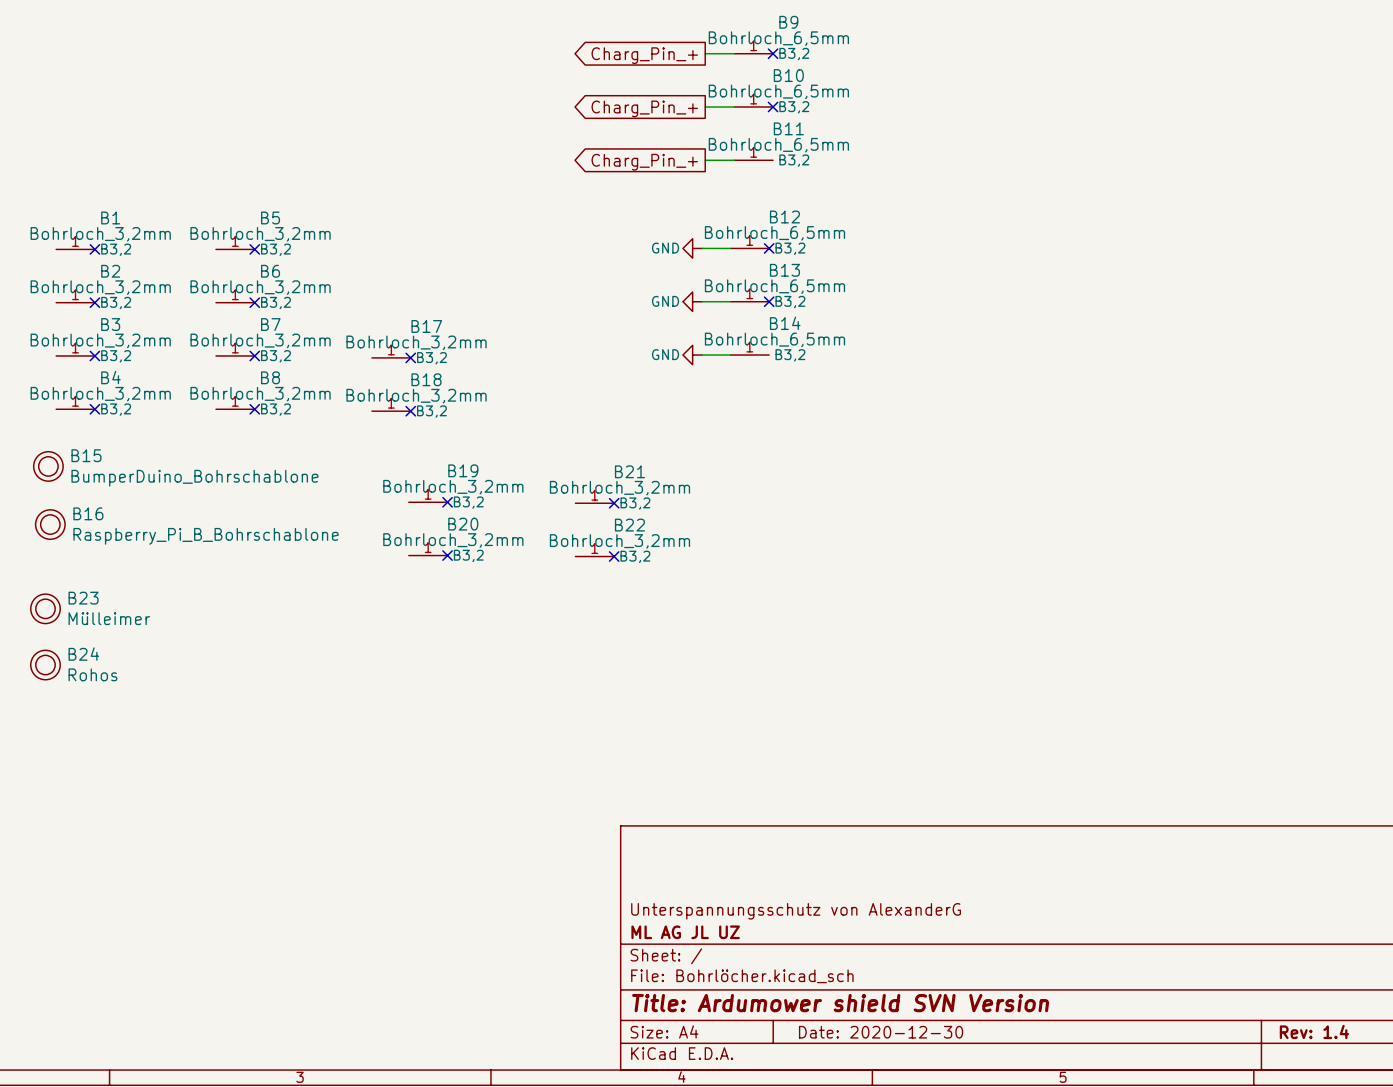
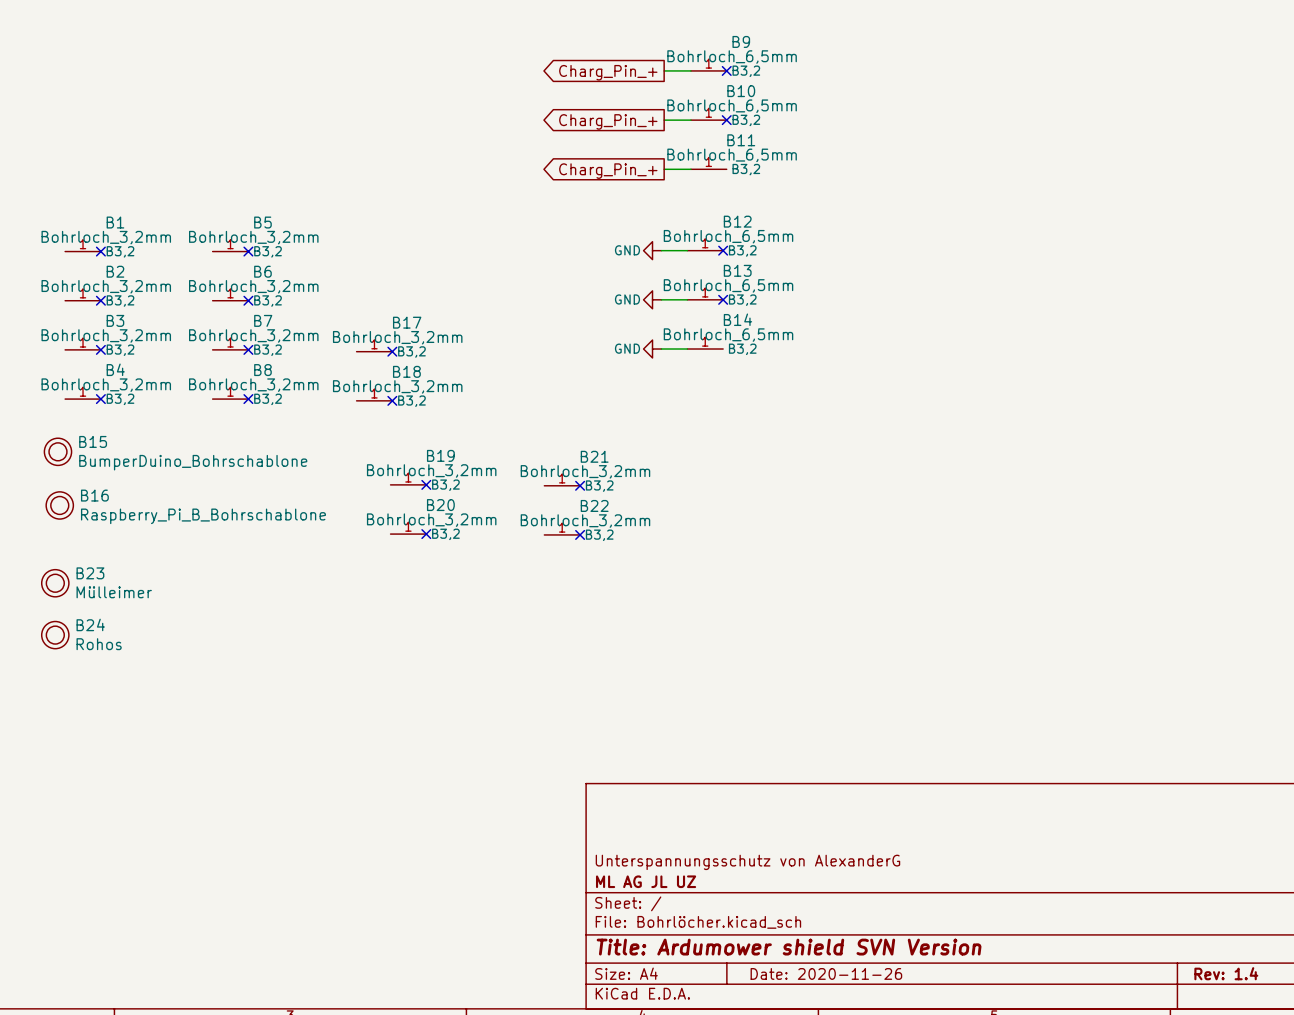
title block: Date: 2020-12-30 (881, 1032) -> Date: 2020-11-26 (826, 973)

